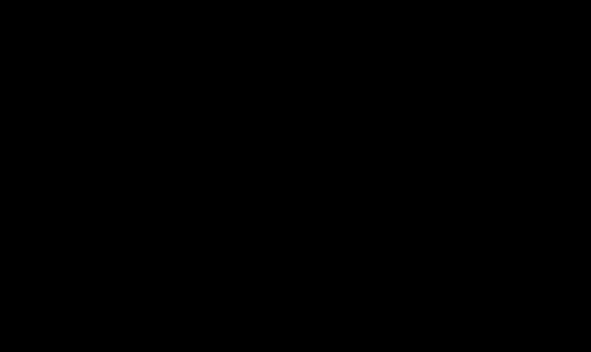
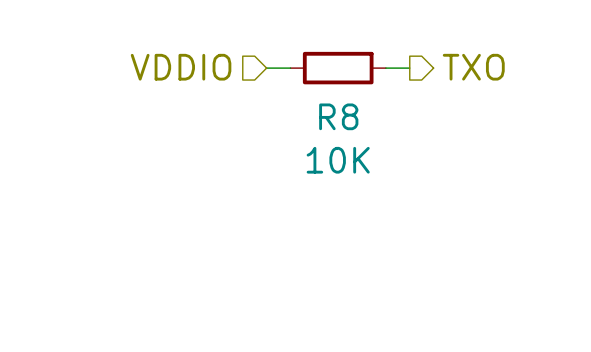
hierarchical label: none -> VDDIO (181, 67)
hierarchical label: none -> TXO (473, 67)
wire: none -> (266, 68) (290, 68)
R8: none -> 10K (338, 68)
wire: none -> (385, 68) (409, 68)

